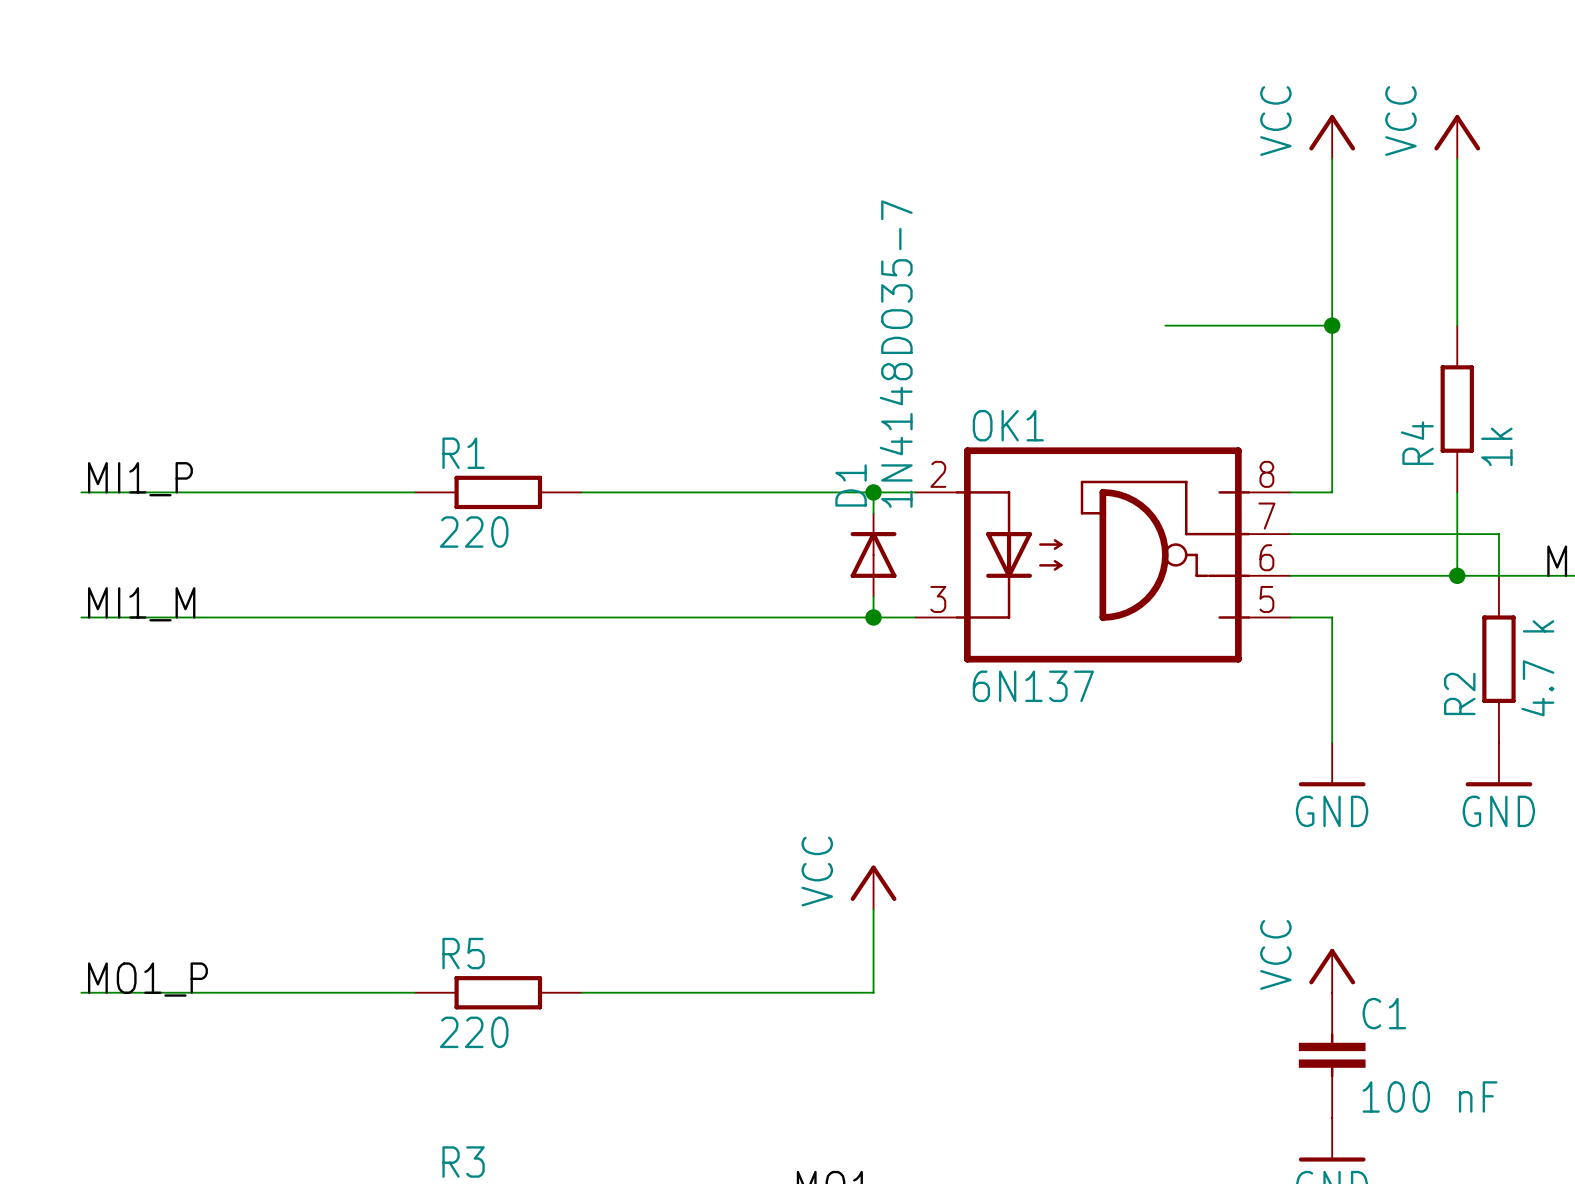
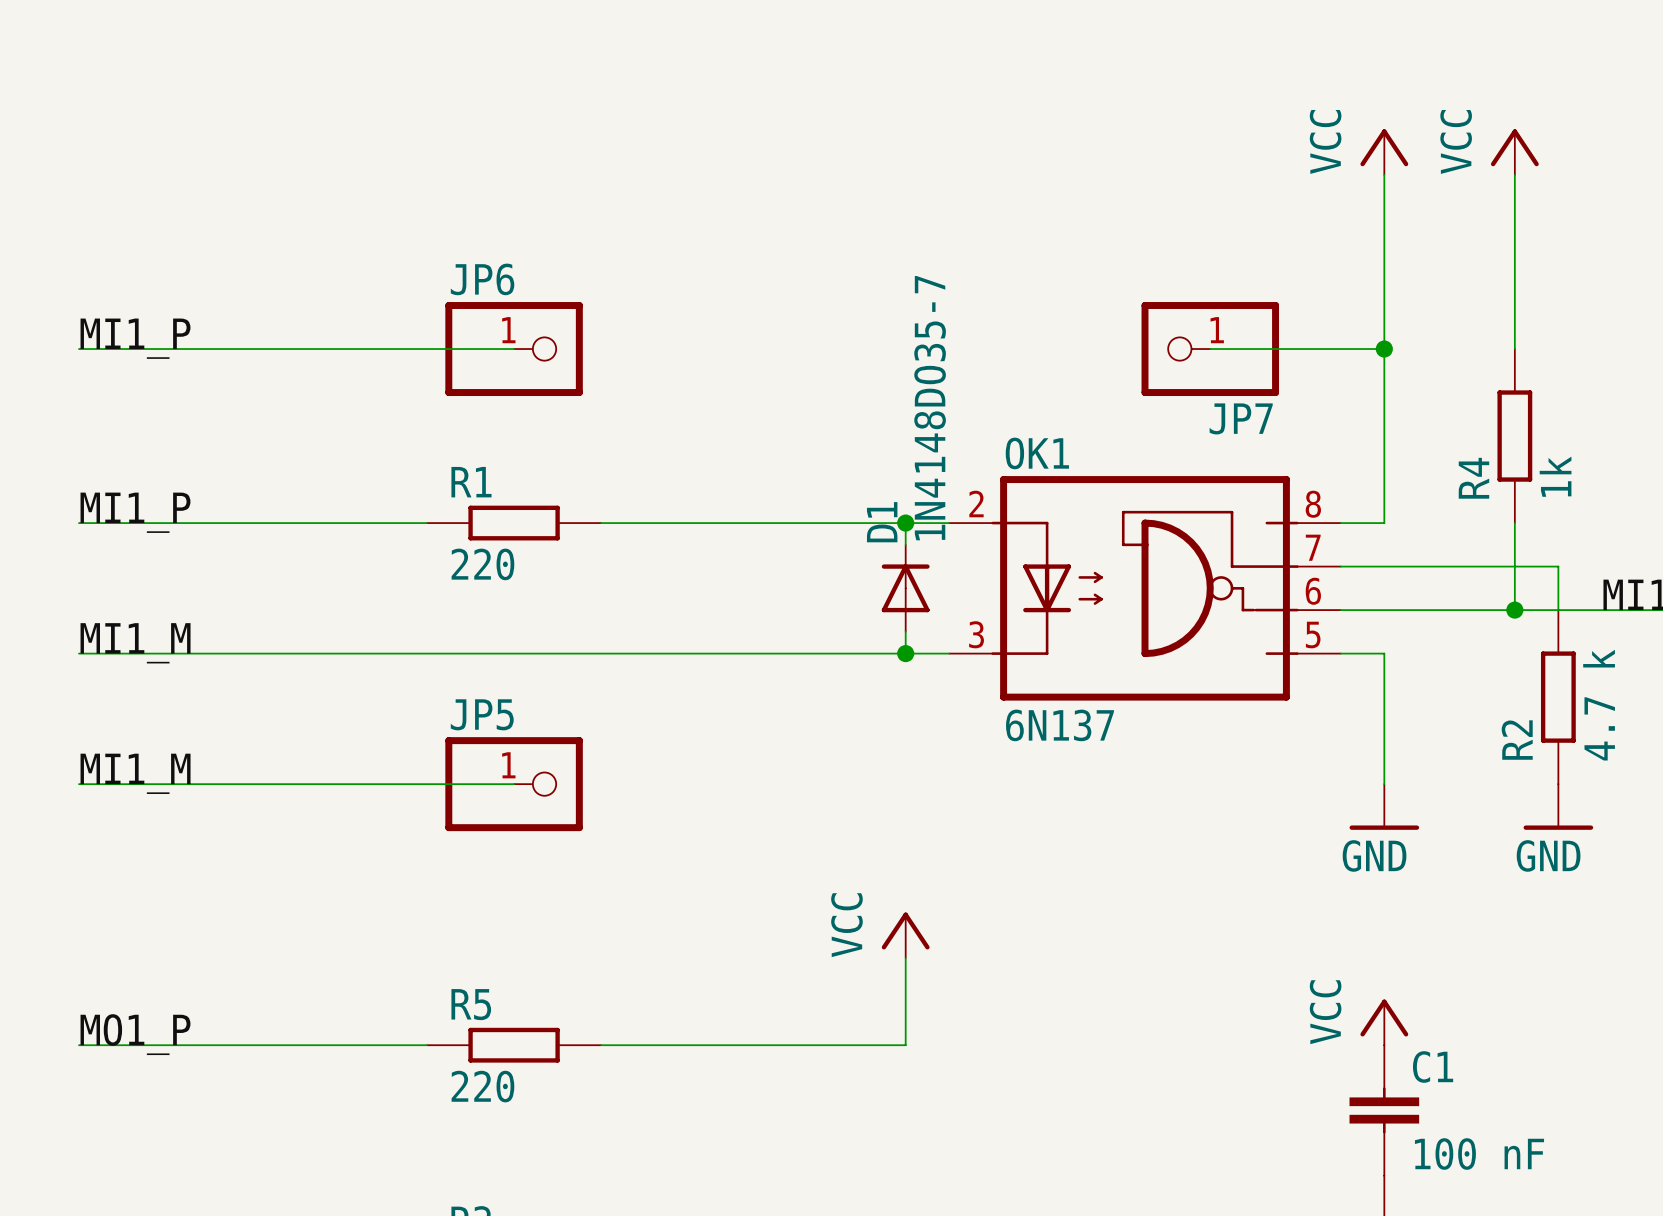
label: none -> MI1_P (135, 338)
wire: none -> (78, 349) (514, 349)
JP6: none -> (514, 349)
JP7: none -> (1210, 349)
label: none -> MI1_M (135, 773)
wire: none -> (78, 784) (514, 784)
JP5: none -> (514, 784)

